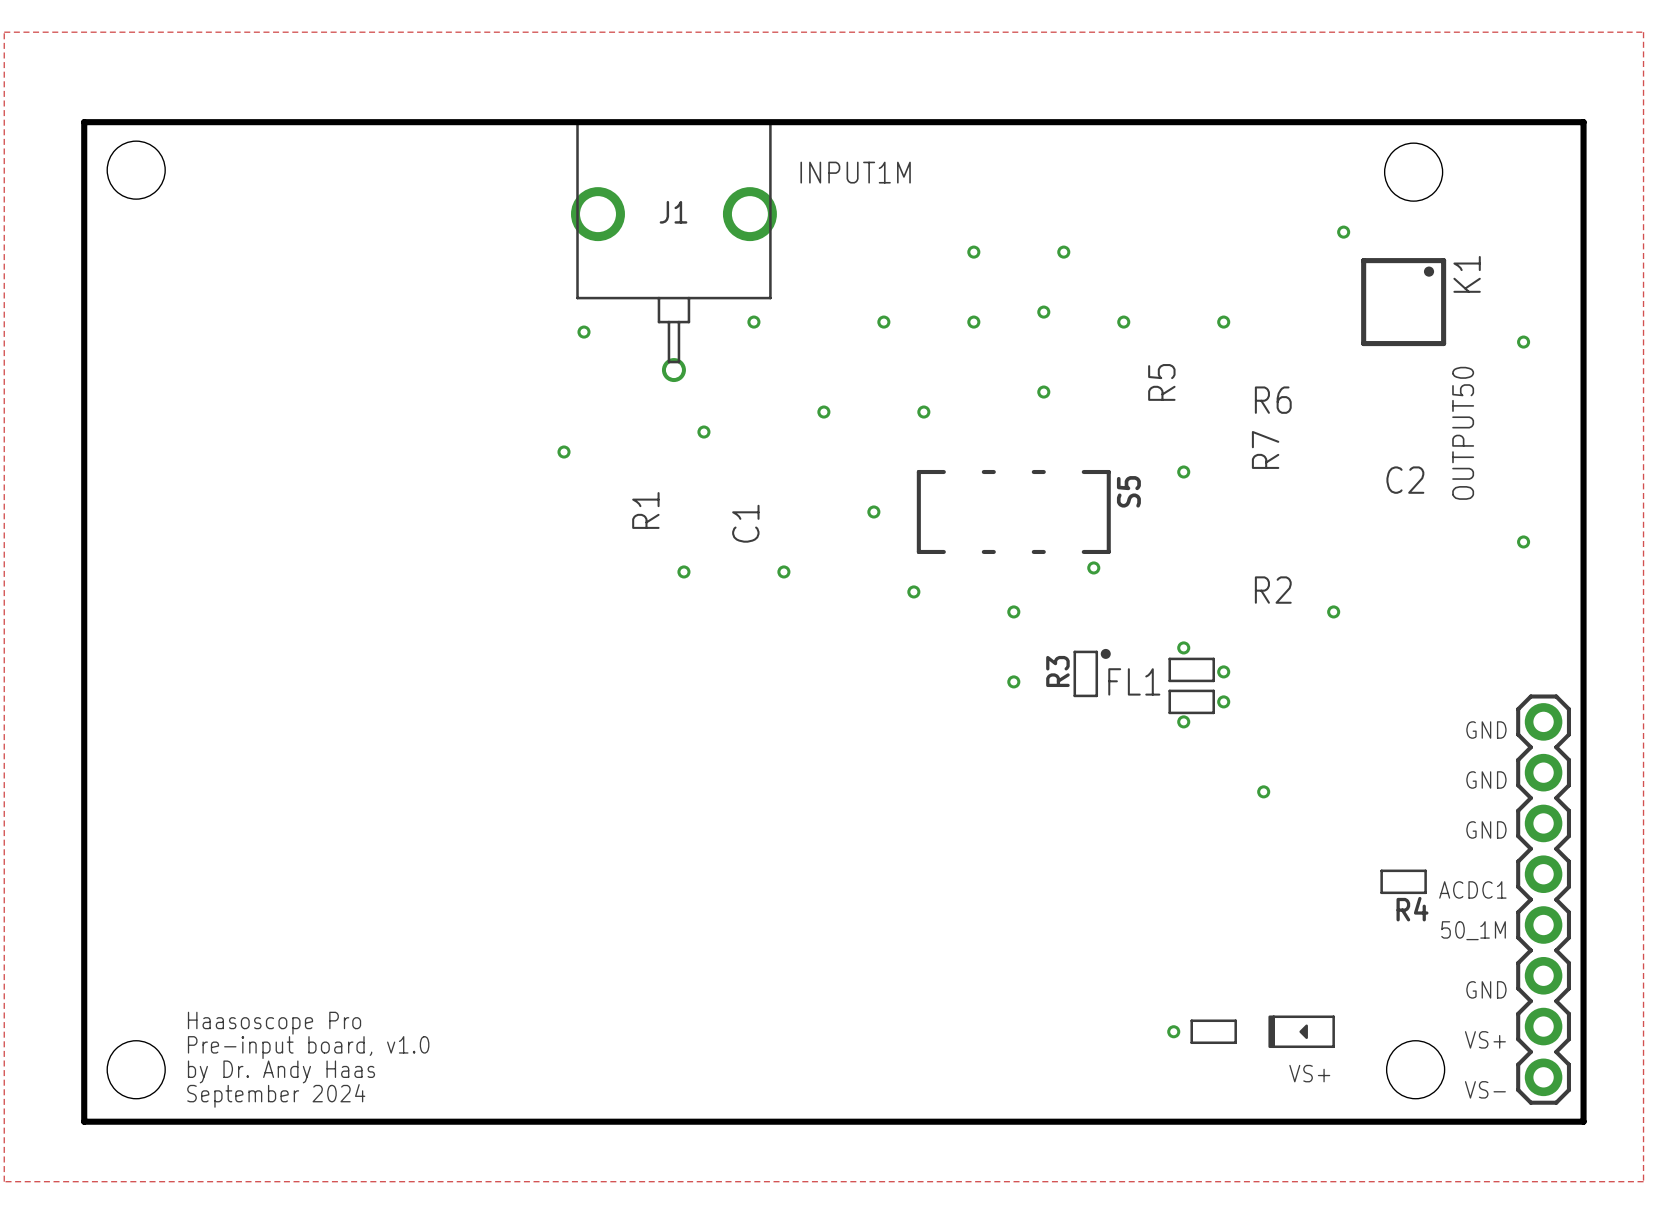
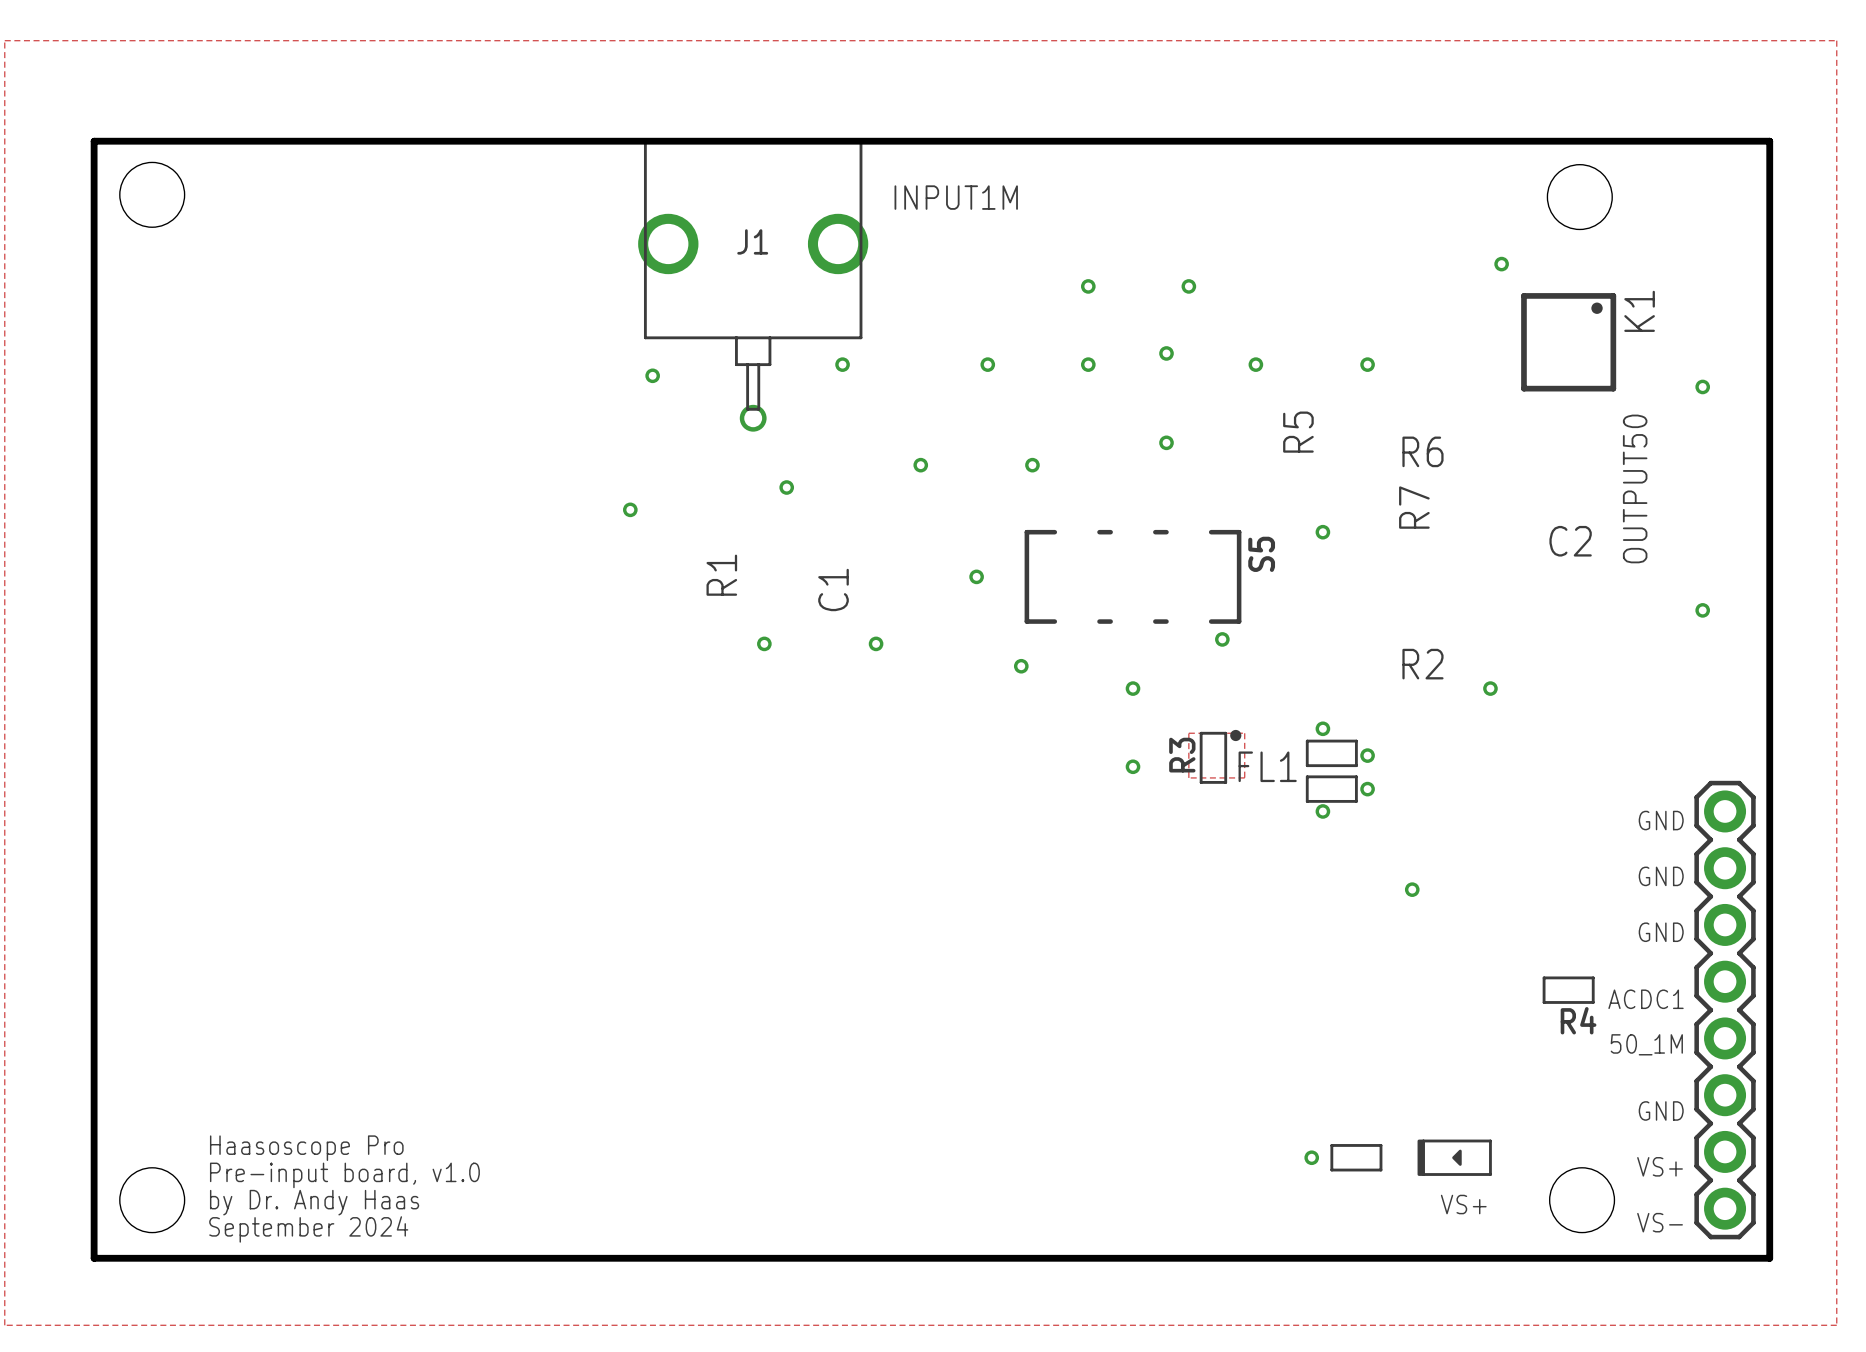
zone outline: none -> (1188, 733) (1244, 733) (1244, 777) (1188, 777) (1188, 733)

